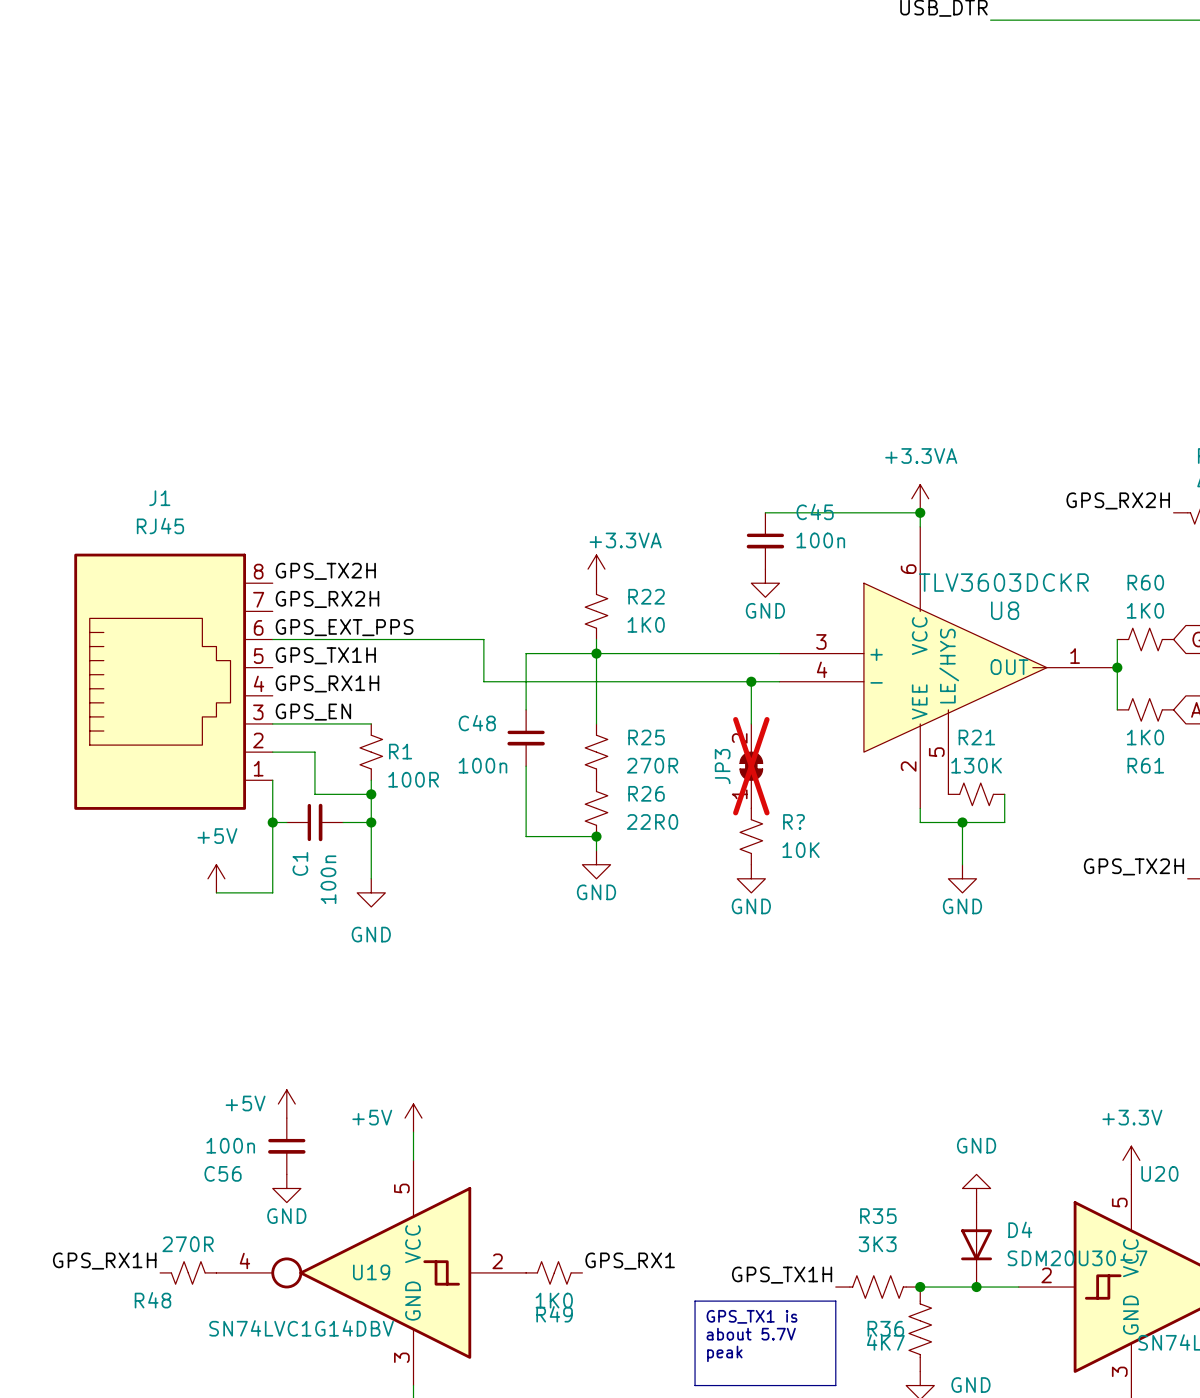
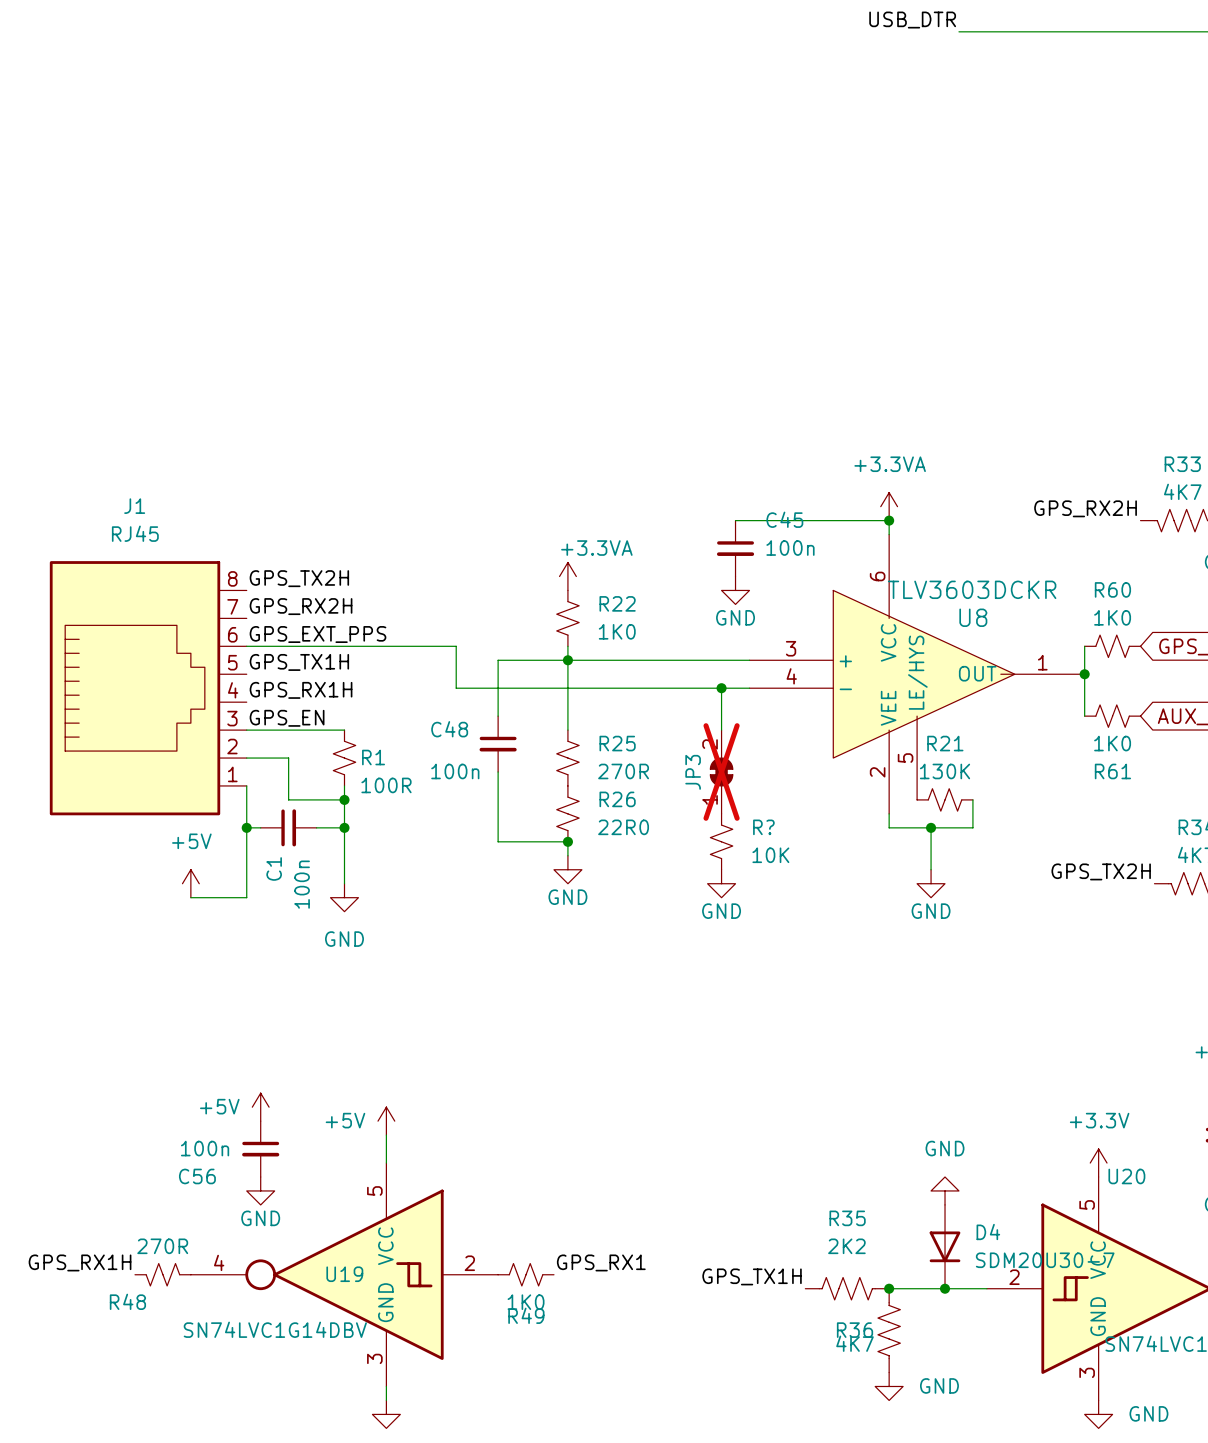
R35 value: 3K3 (877, 1244) -> 2K2 (846, 1246)
line: (695, 1301) (835, 1301) (835, 1385) (695, 1385) (695, 1301) -> none
text: GPS_TX1 is (752, 1316) -> none
text: about 5.7V (751, 1334) -> none
text: peak (724, 1353) -> none

